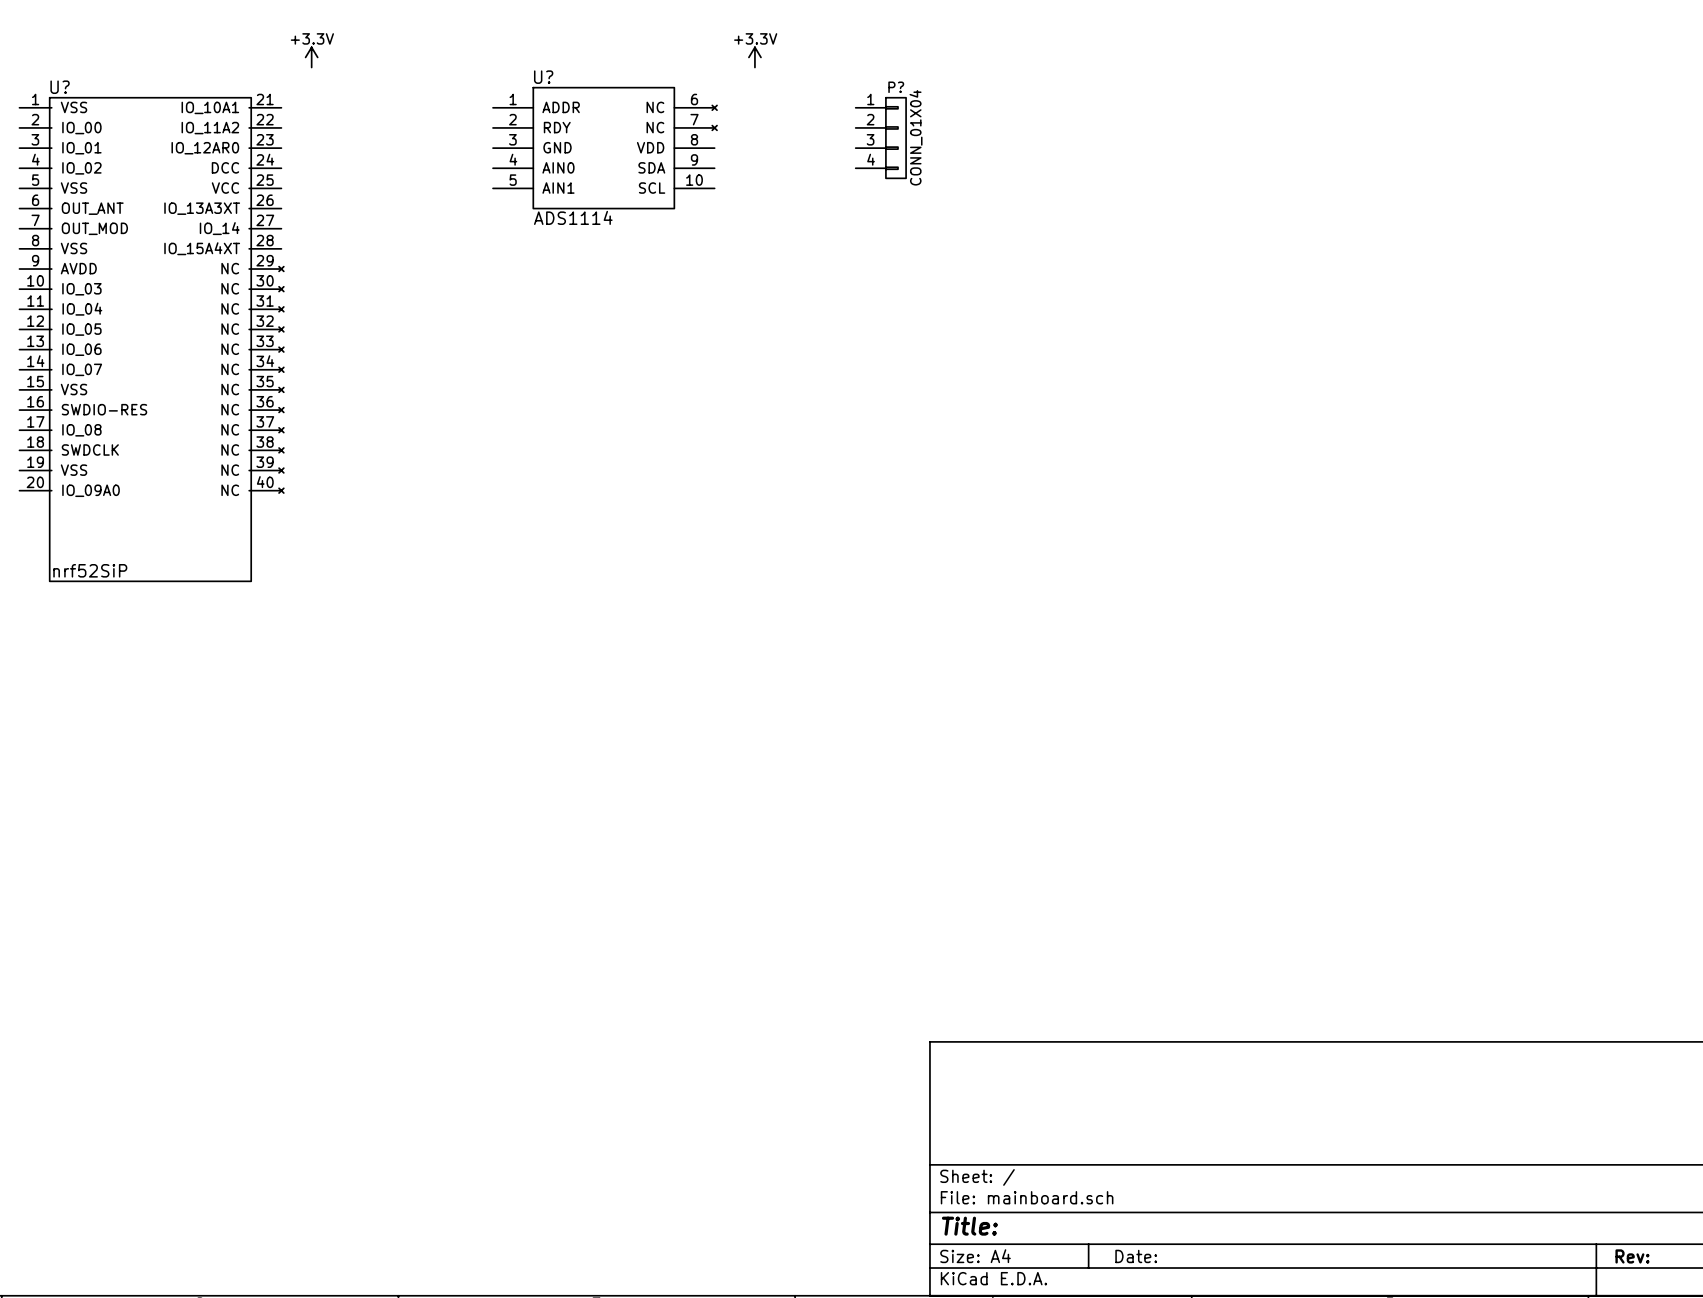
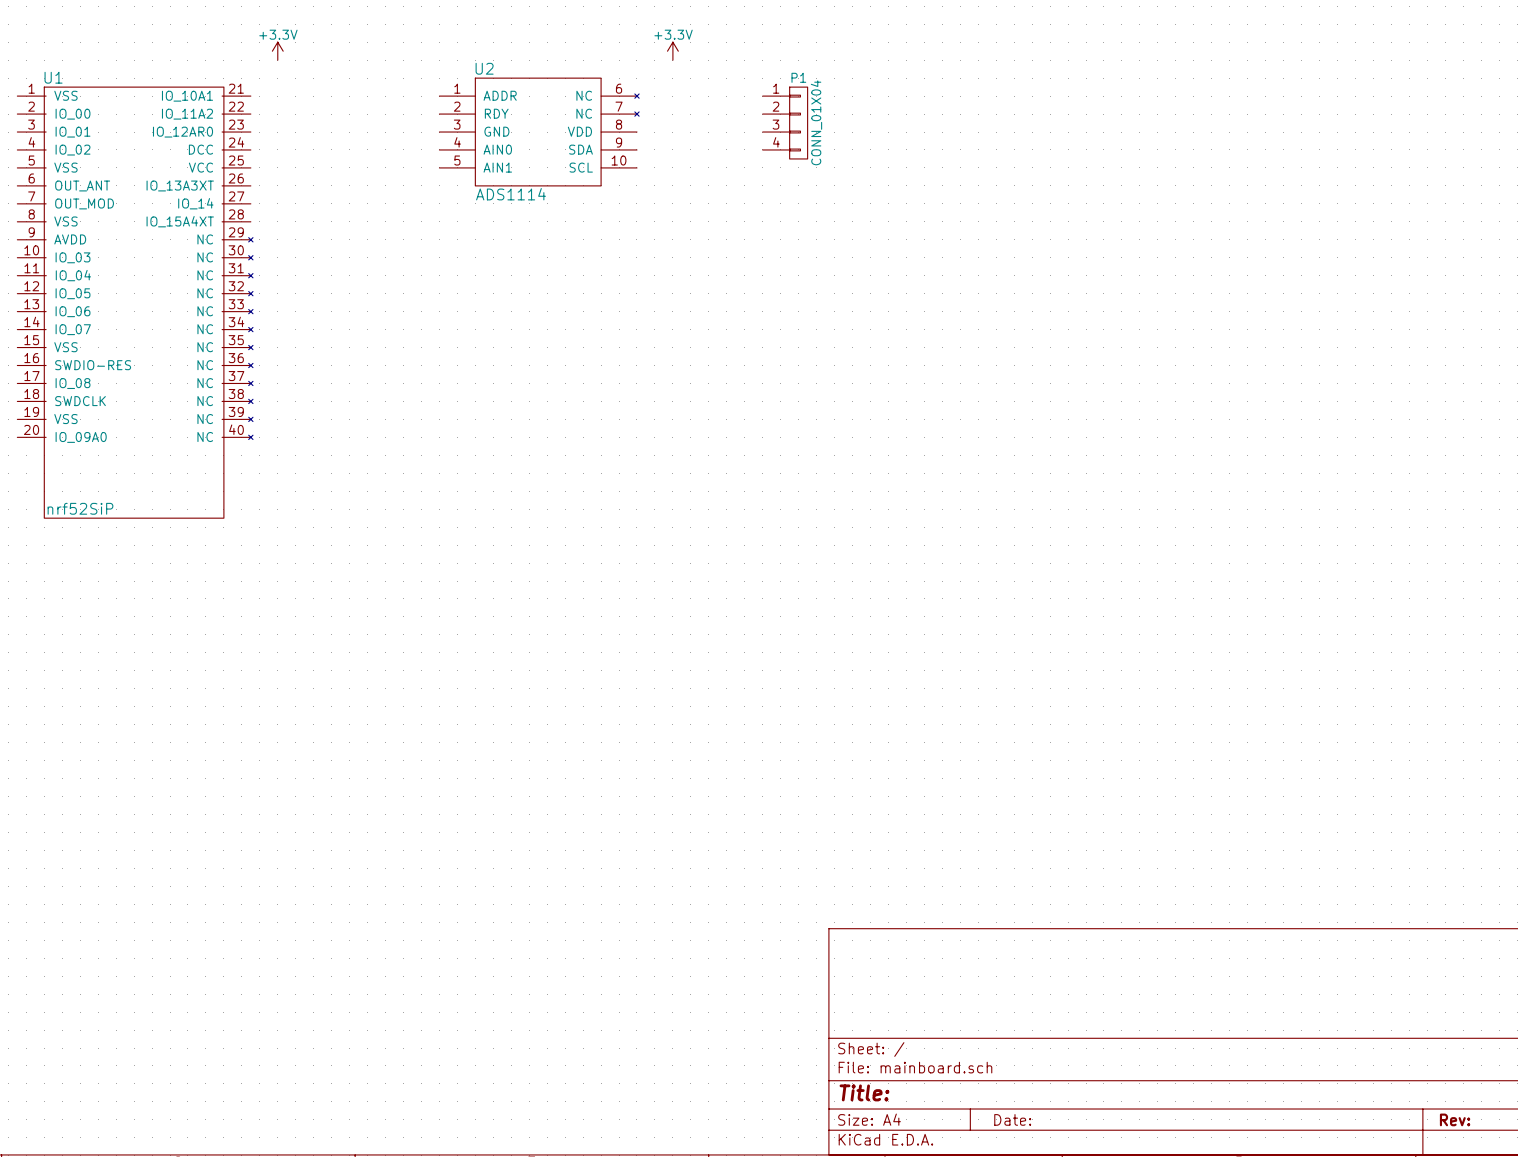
U? name: U? (543, 77) -> U2 (484, 68)
U? name: U? (60, 87) -> U1 (53, 77)
P? name: P? (896, 87) -> P1 (798, 77)

